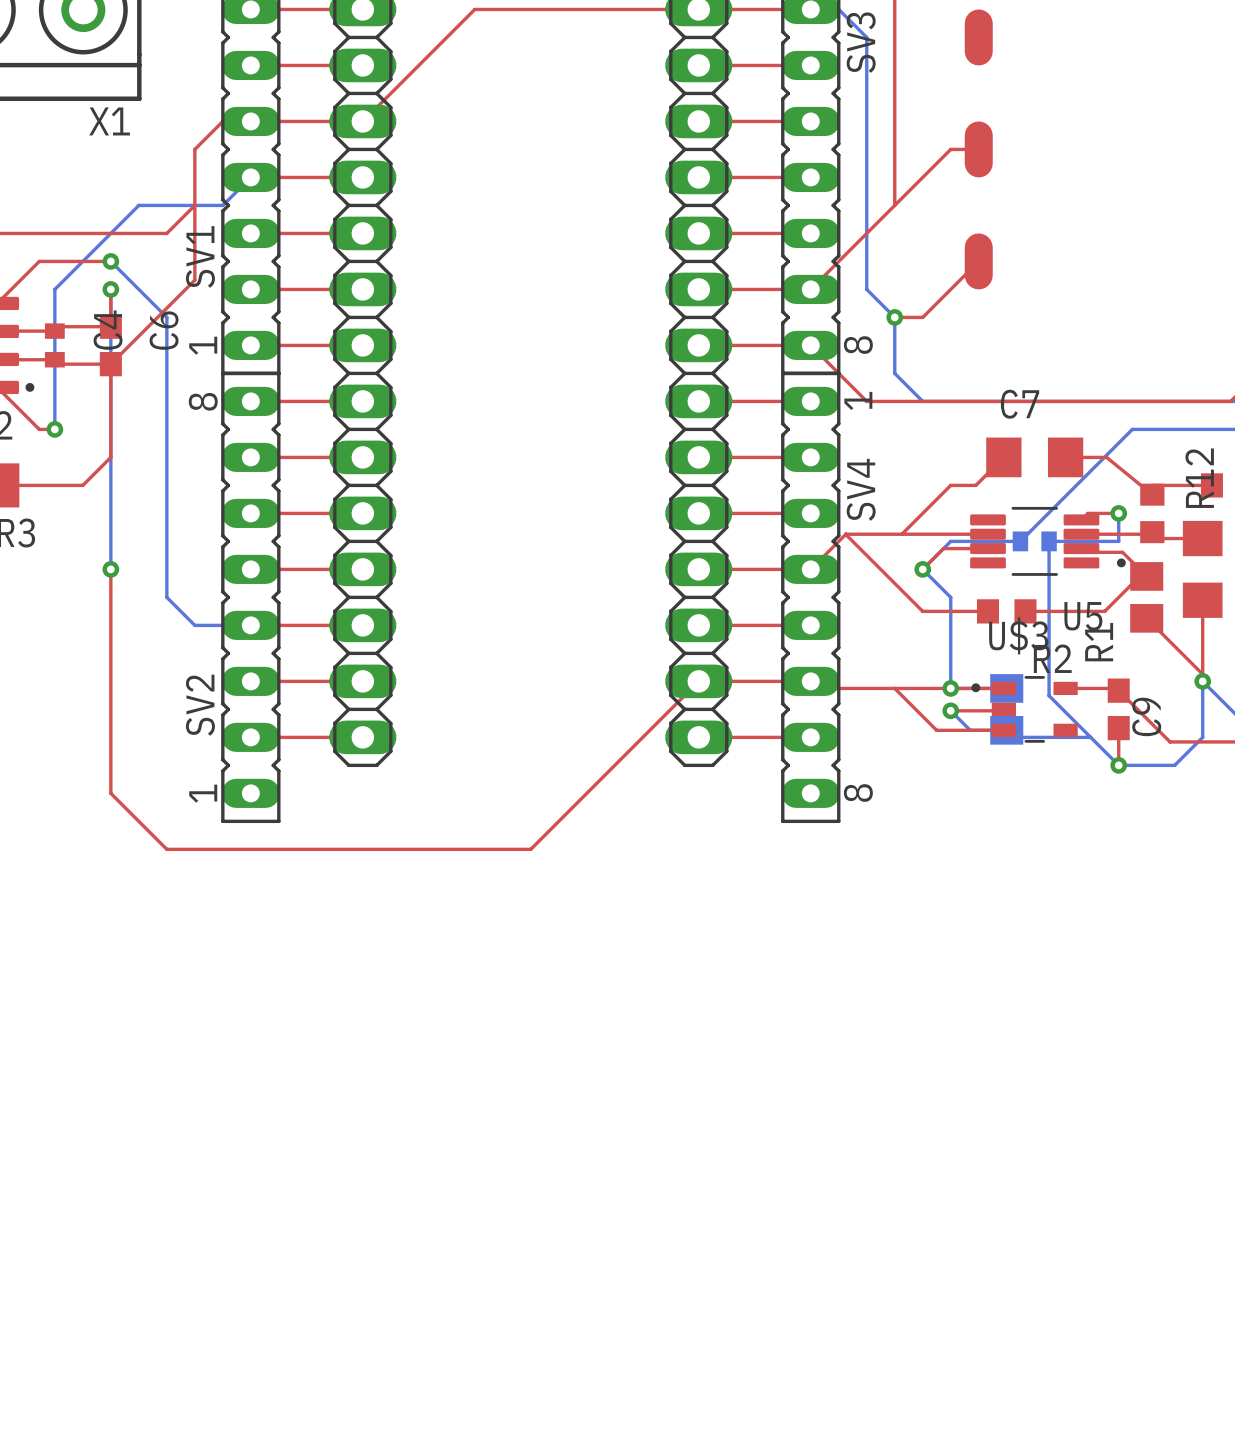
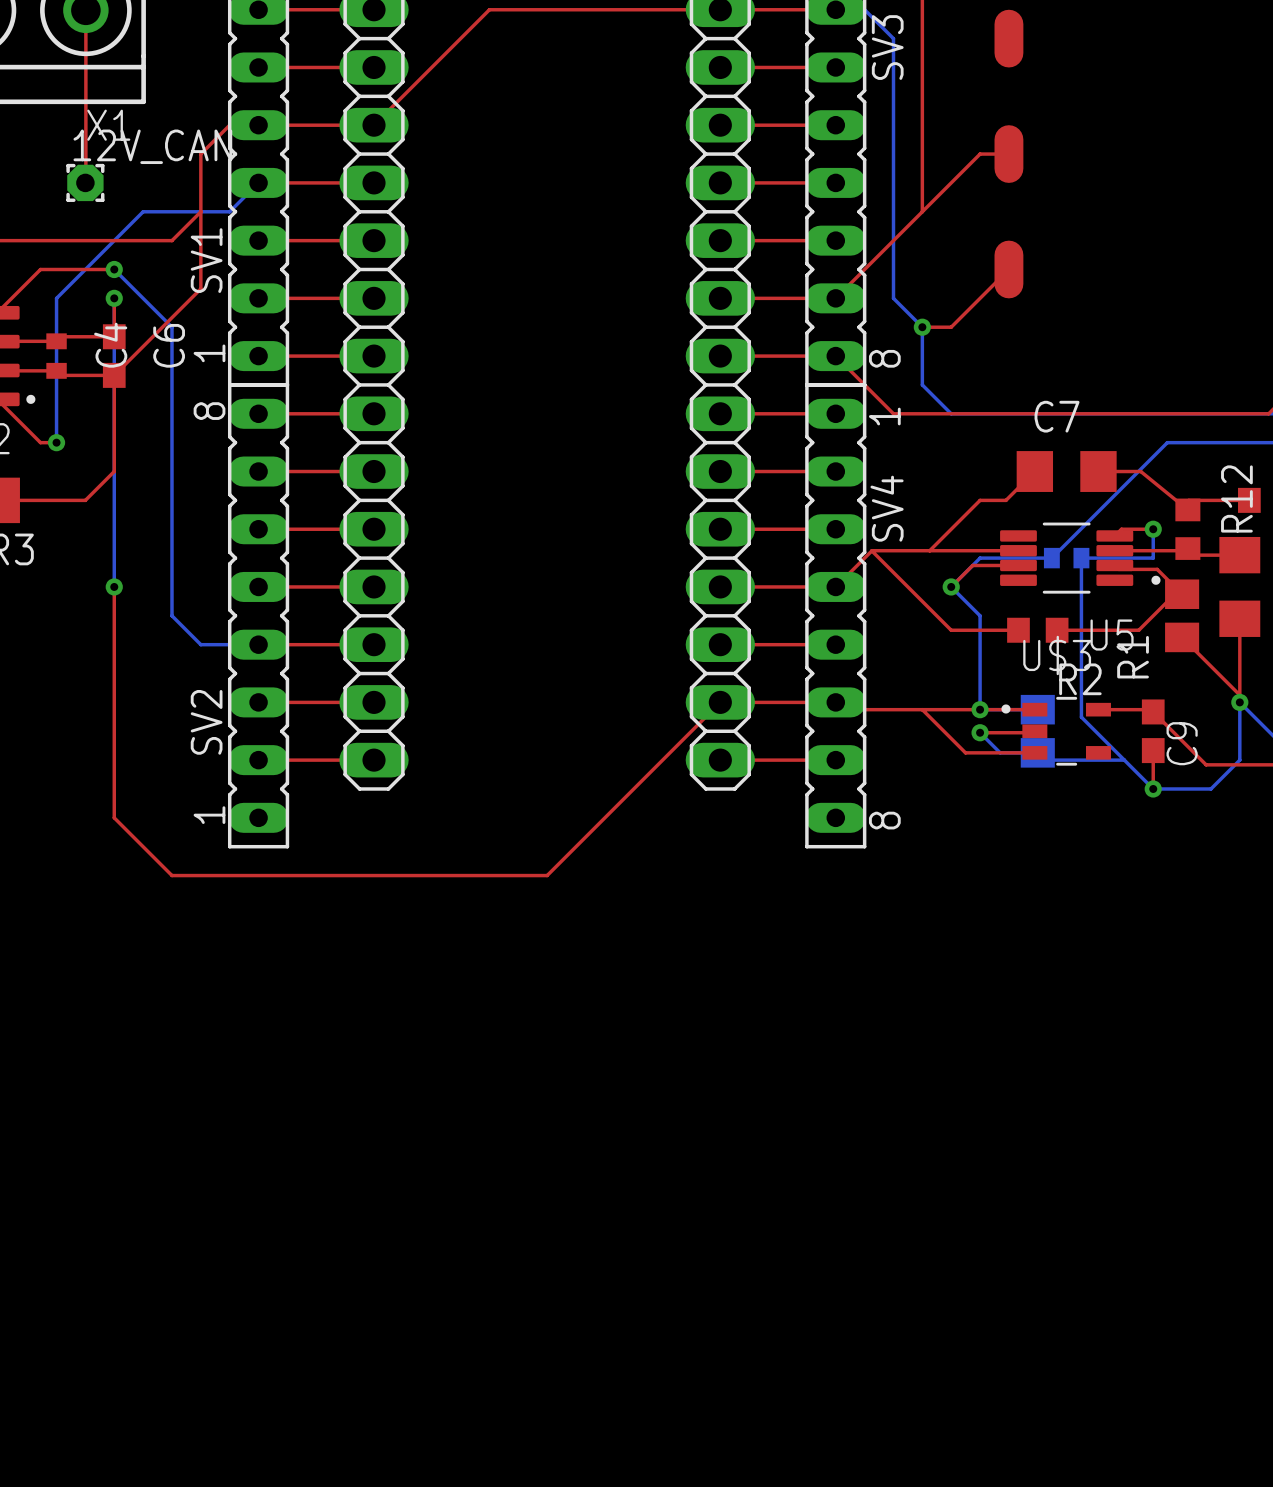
top track: none -> (85, 10) (85, 182)
12V_CAN: none -> (85, 182)

